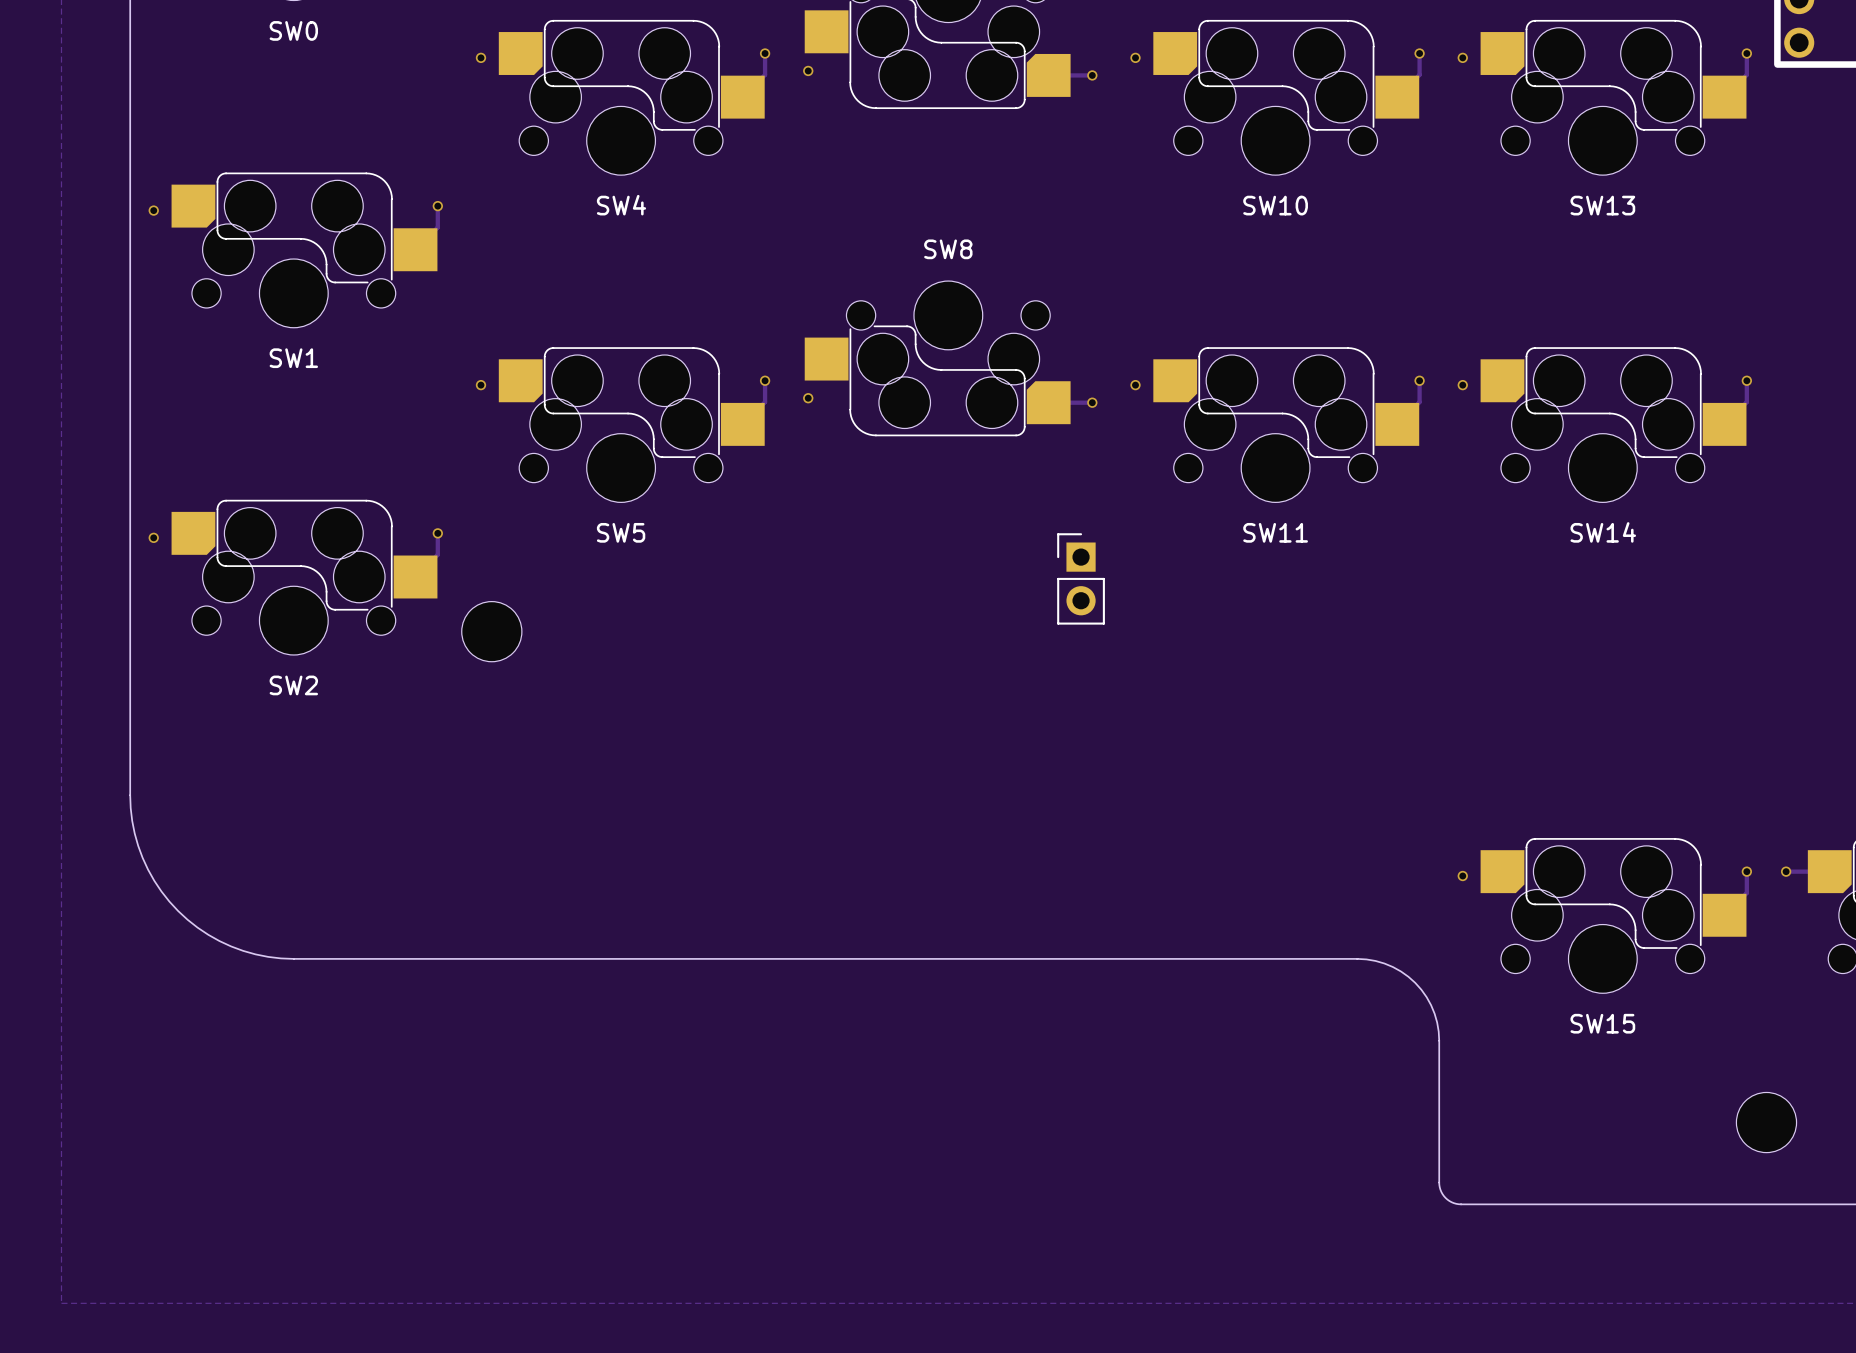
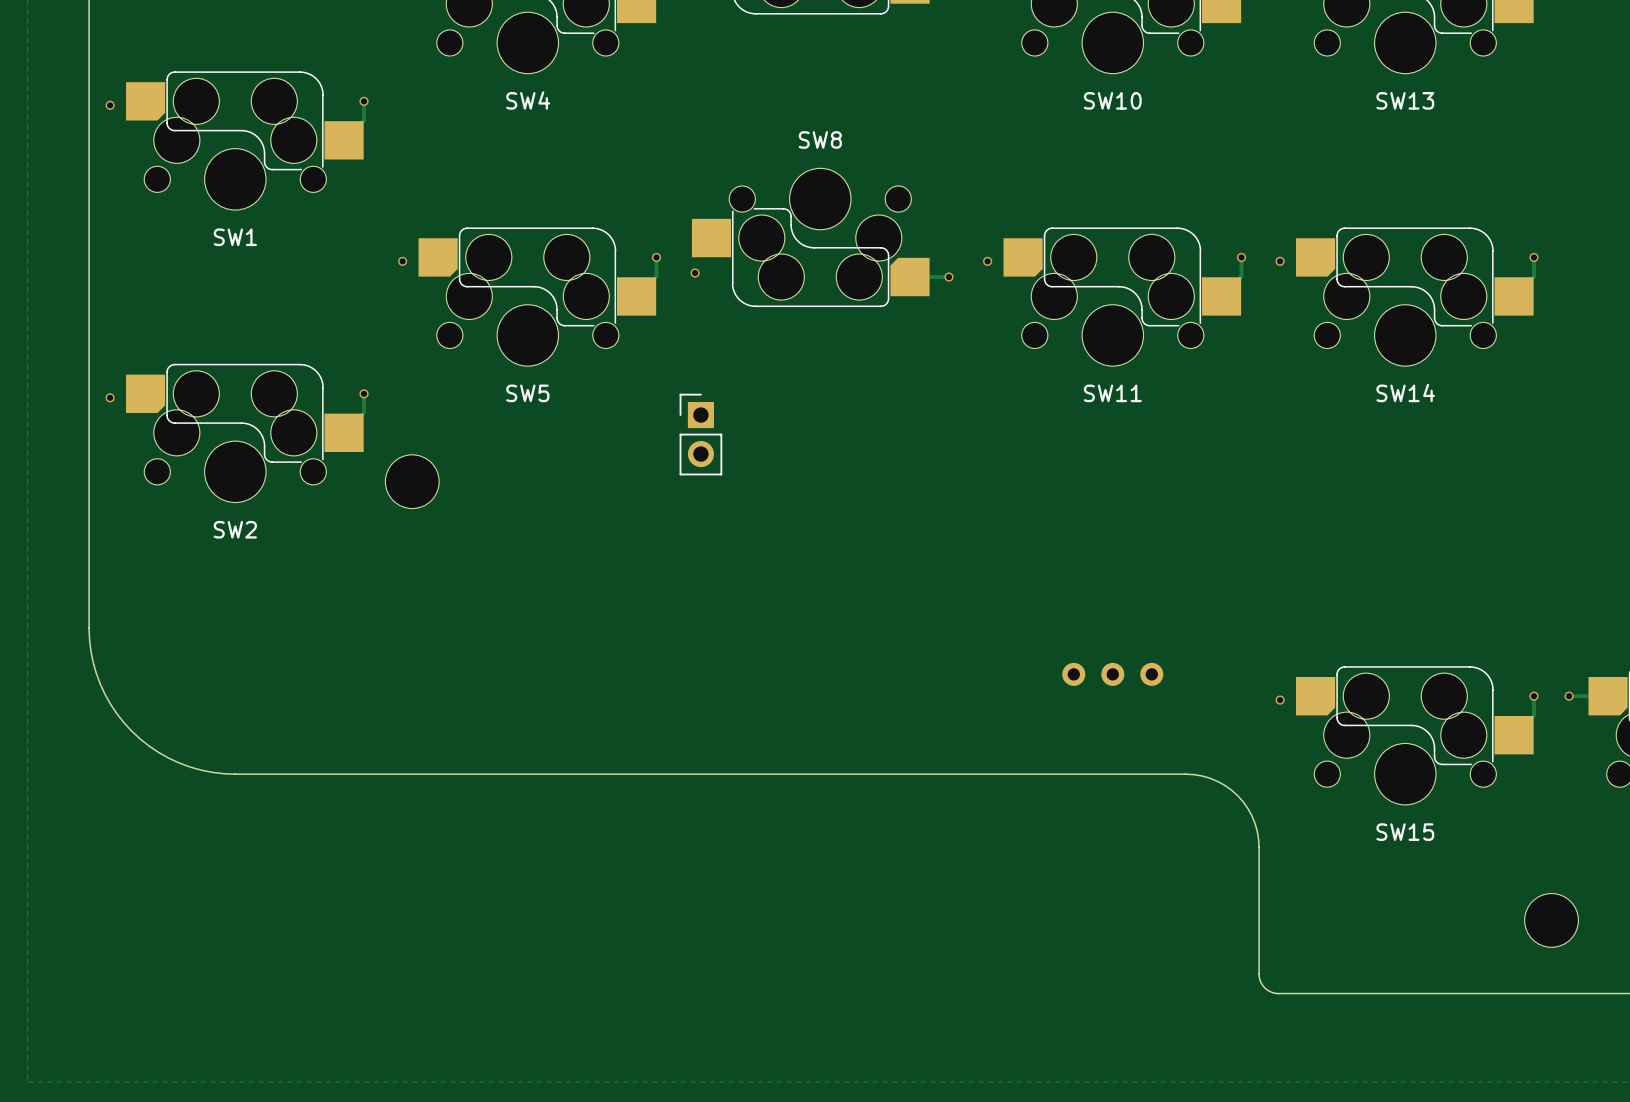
part position: (1081, 578) -> (700, 434)
part: none -> (1112, 674)

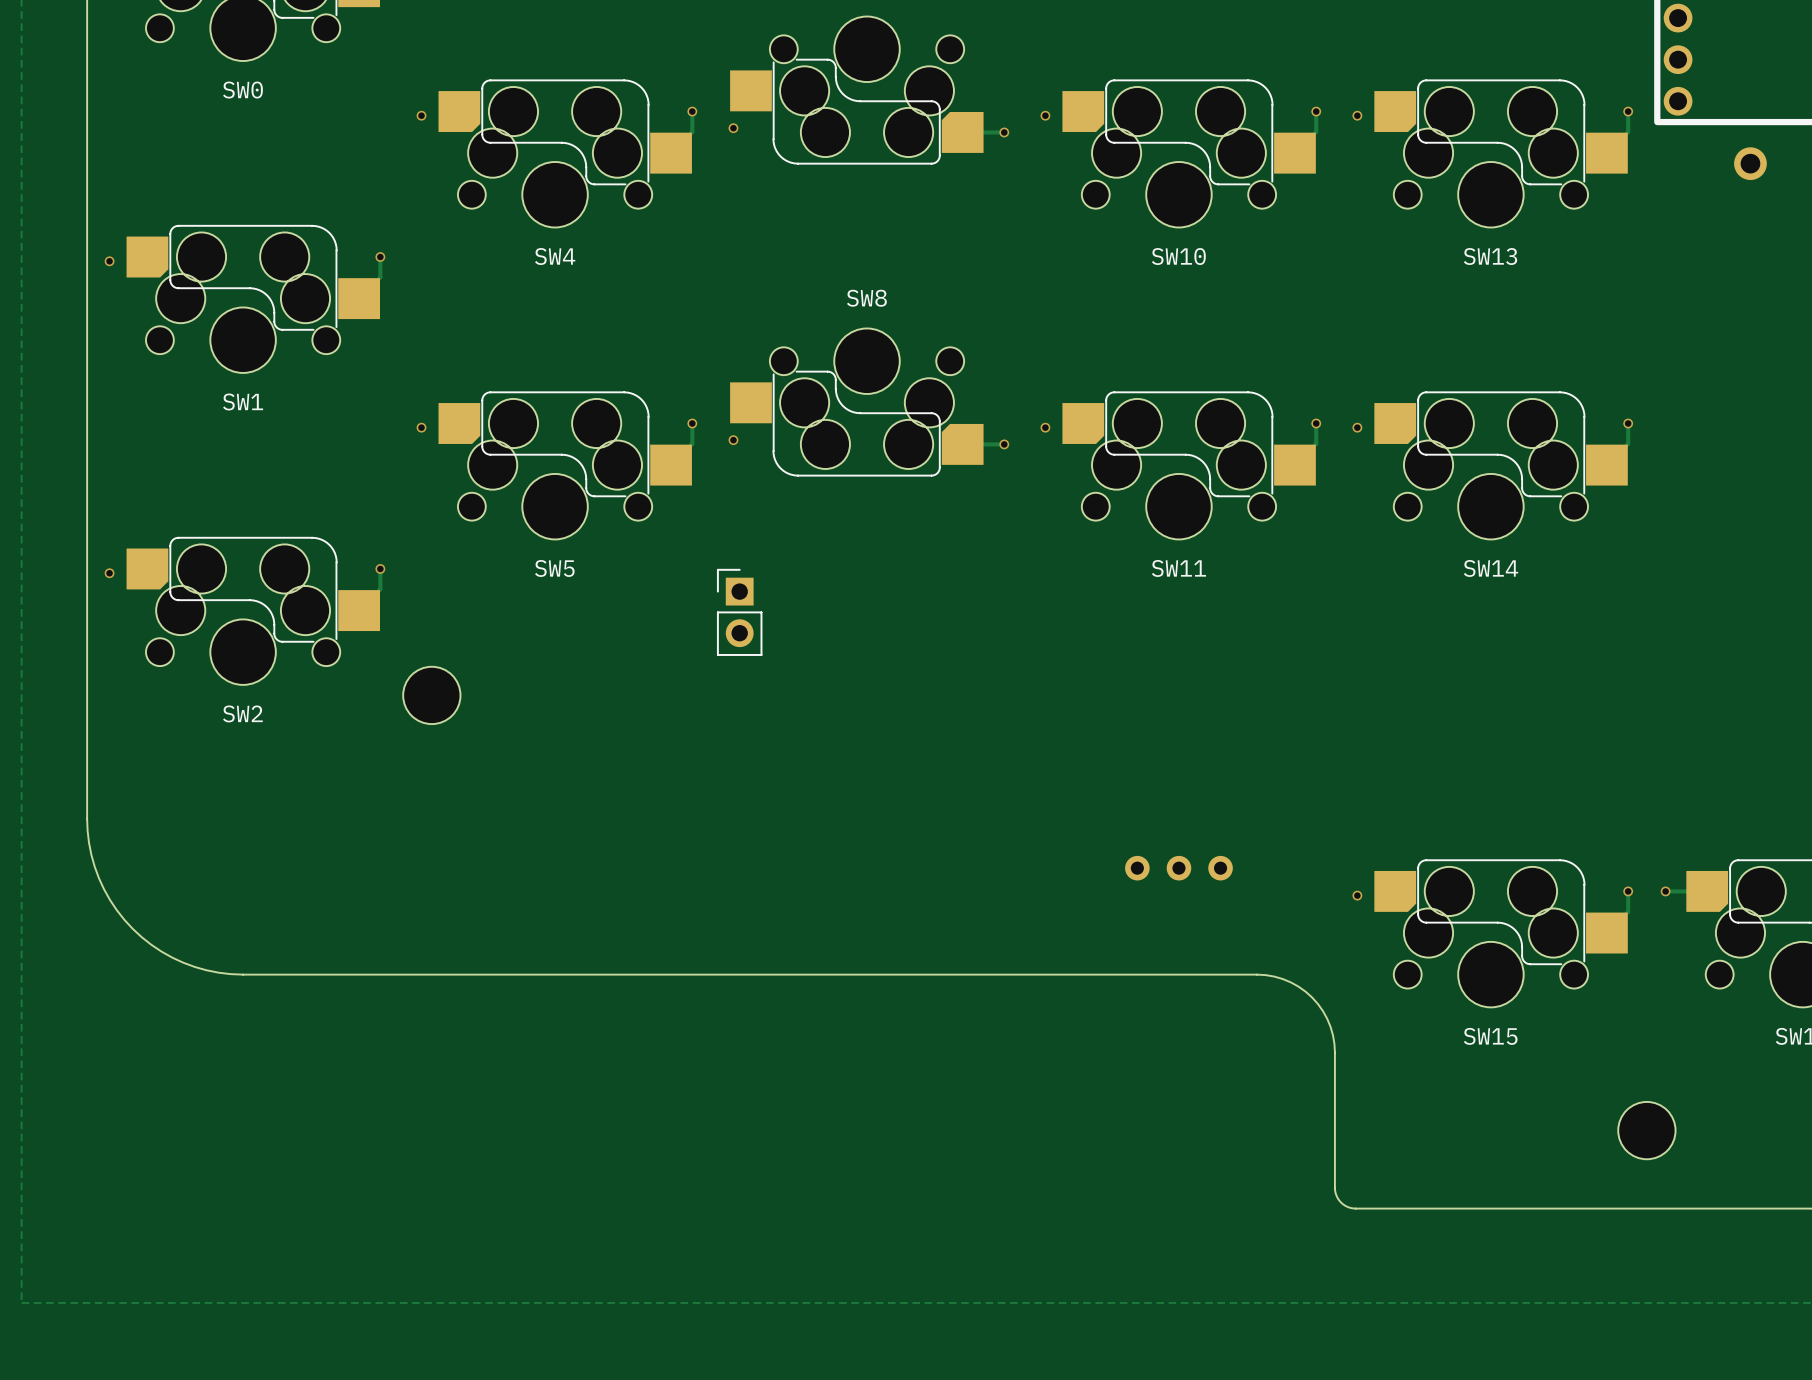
part position: (412, 481) -> (431, 695)

